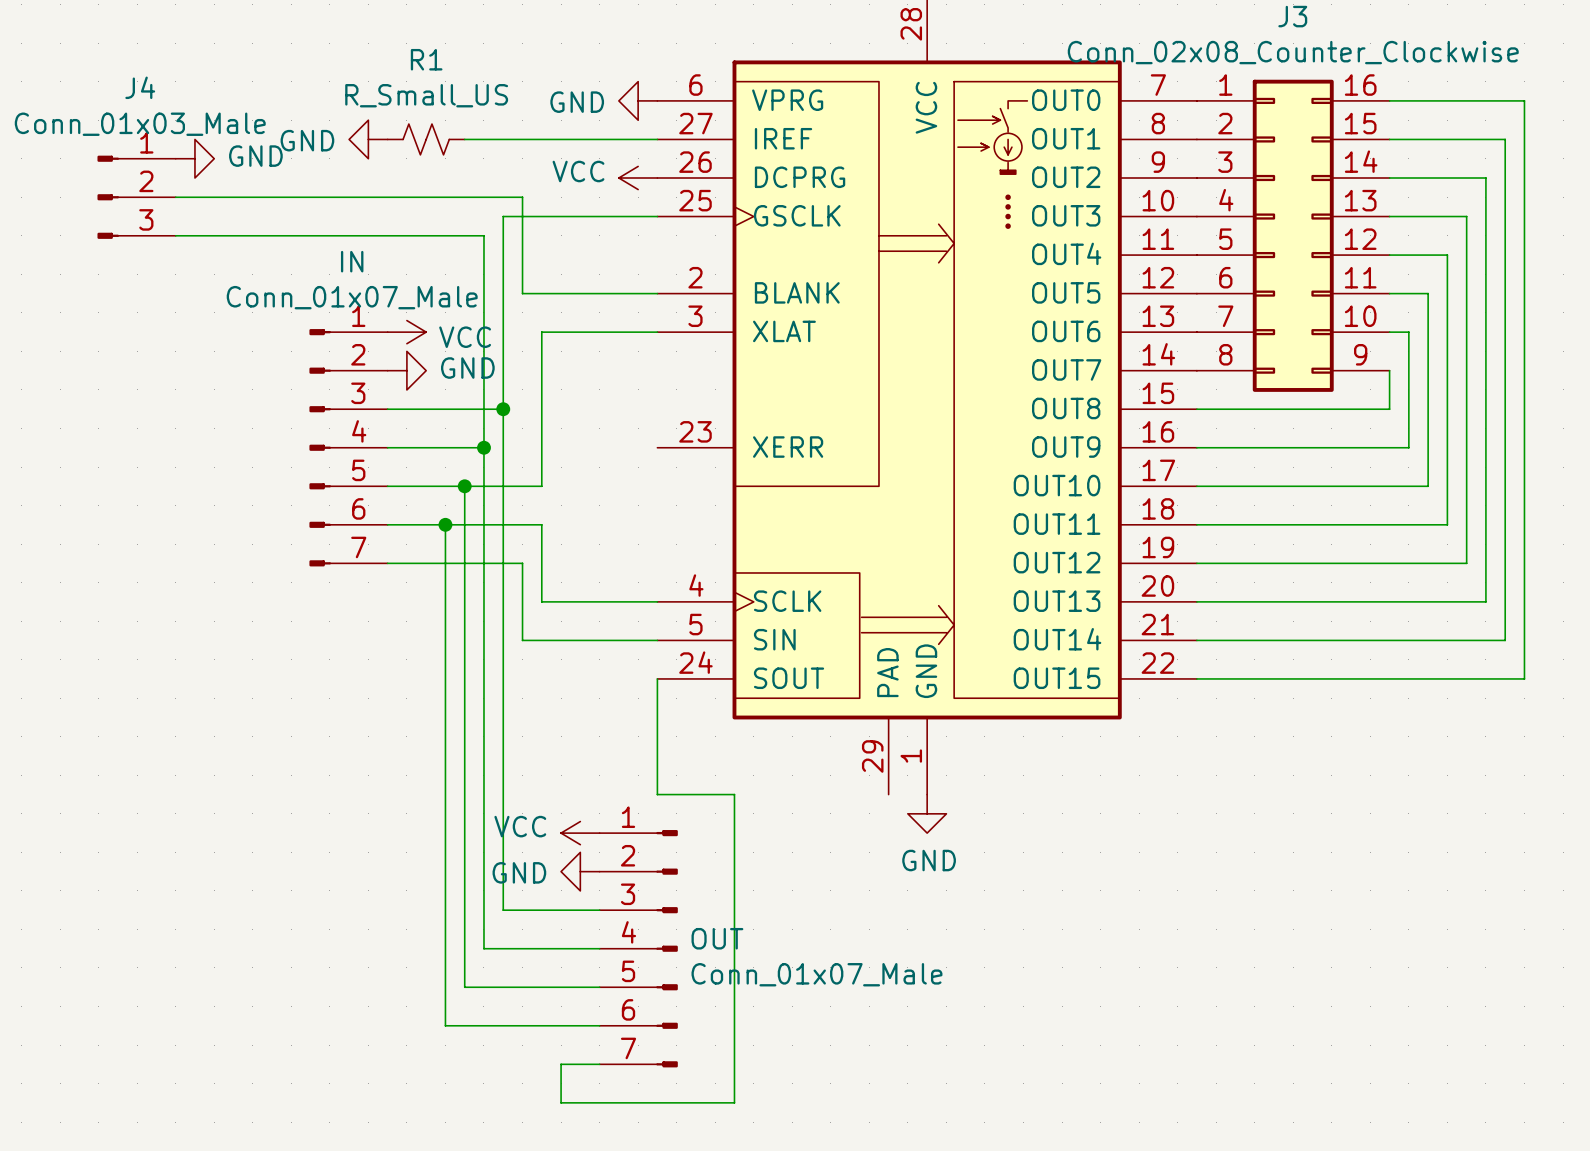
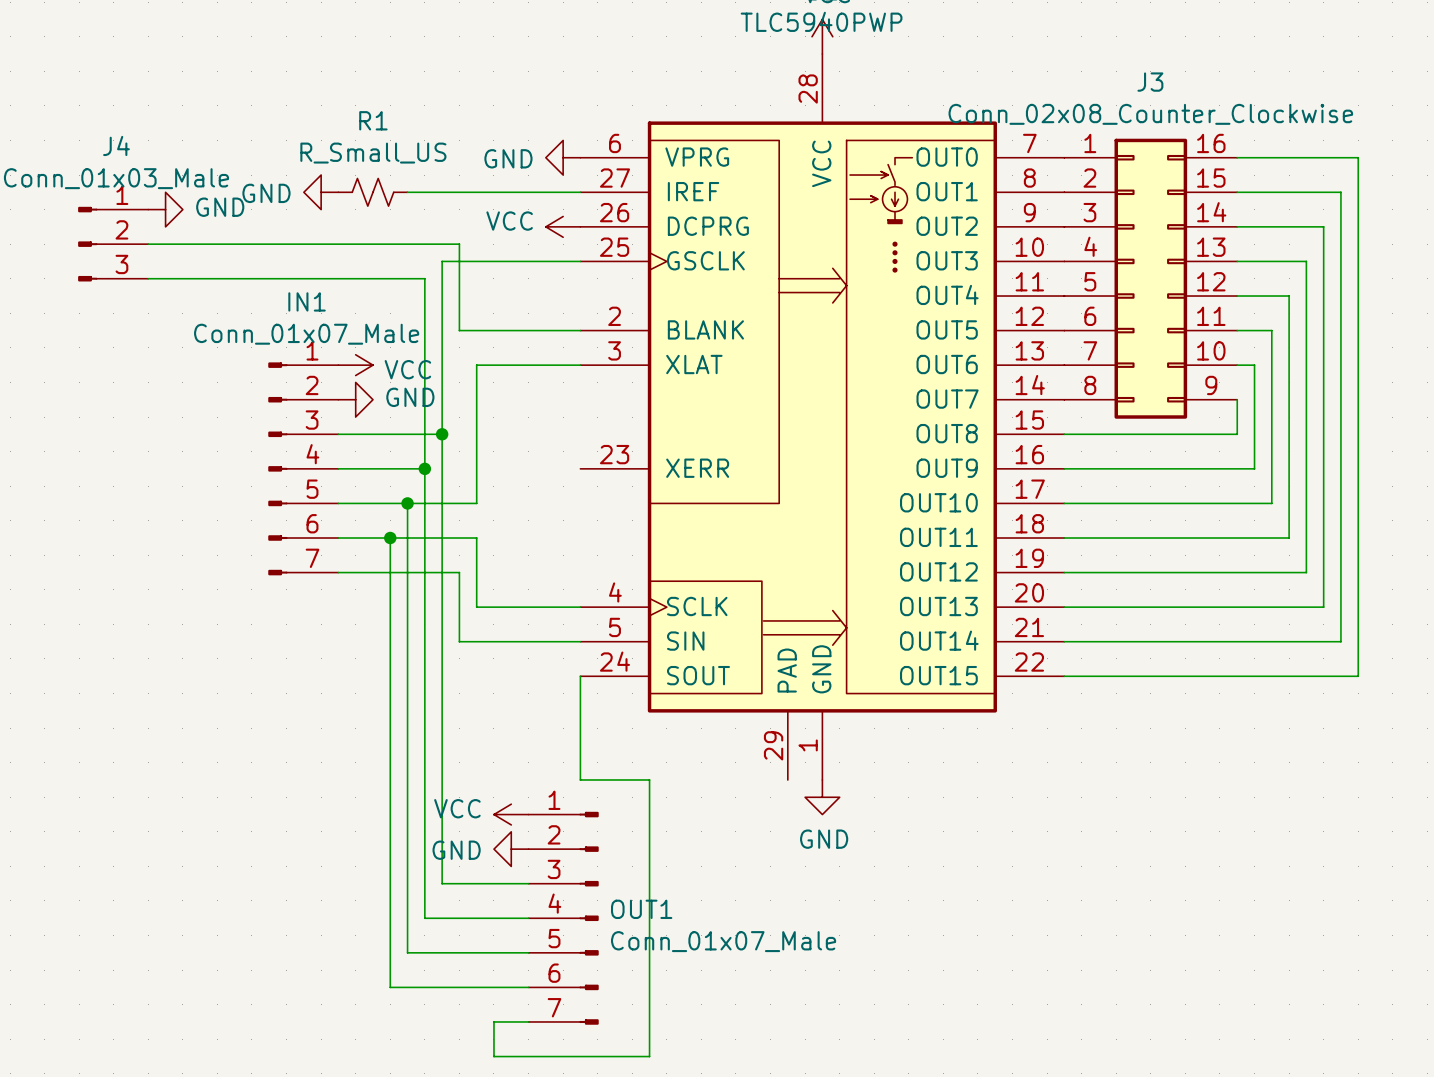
IN name: IN (352, 261) -> IN1 (307, 301)
OUT name: OUT (717, 938) -> OUT1 (641, 909)

